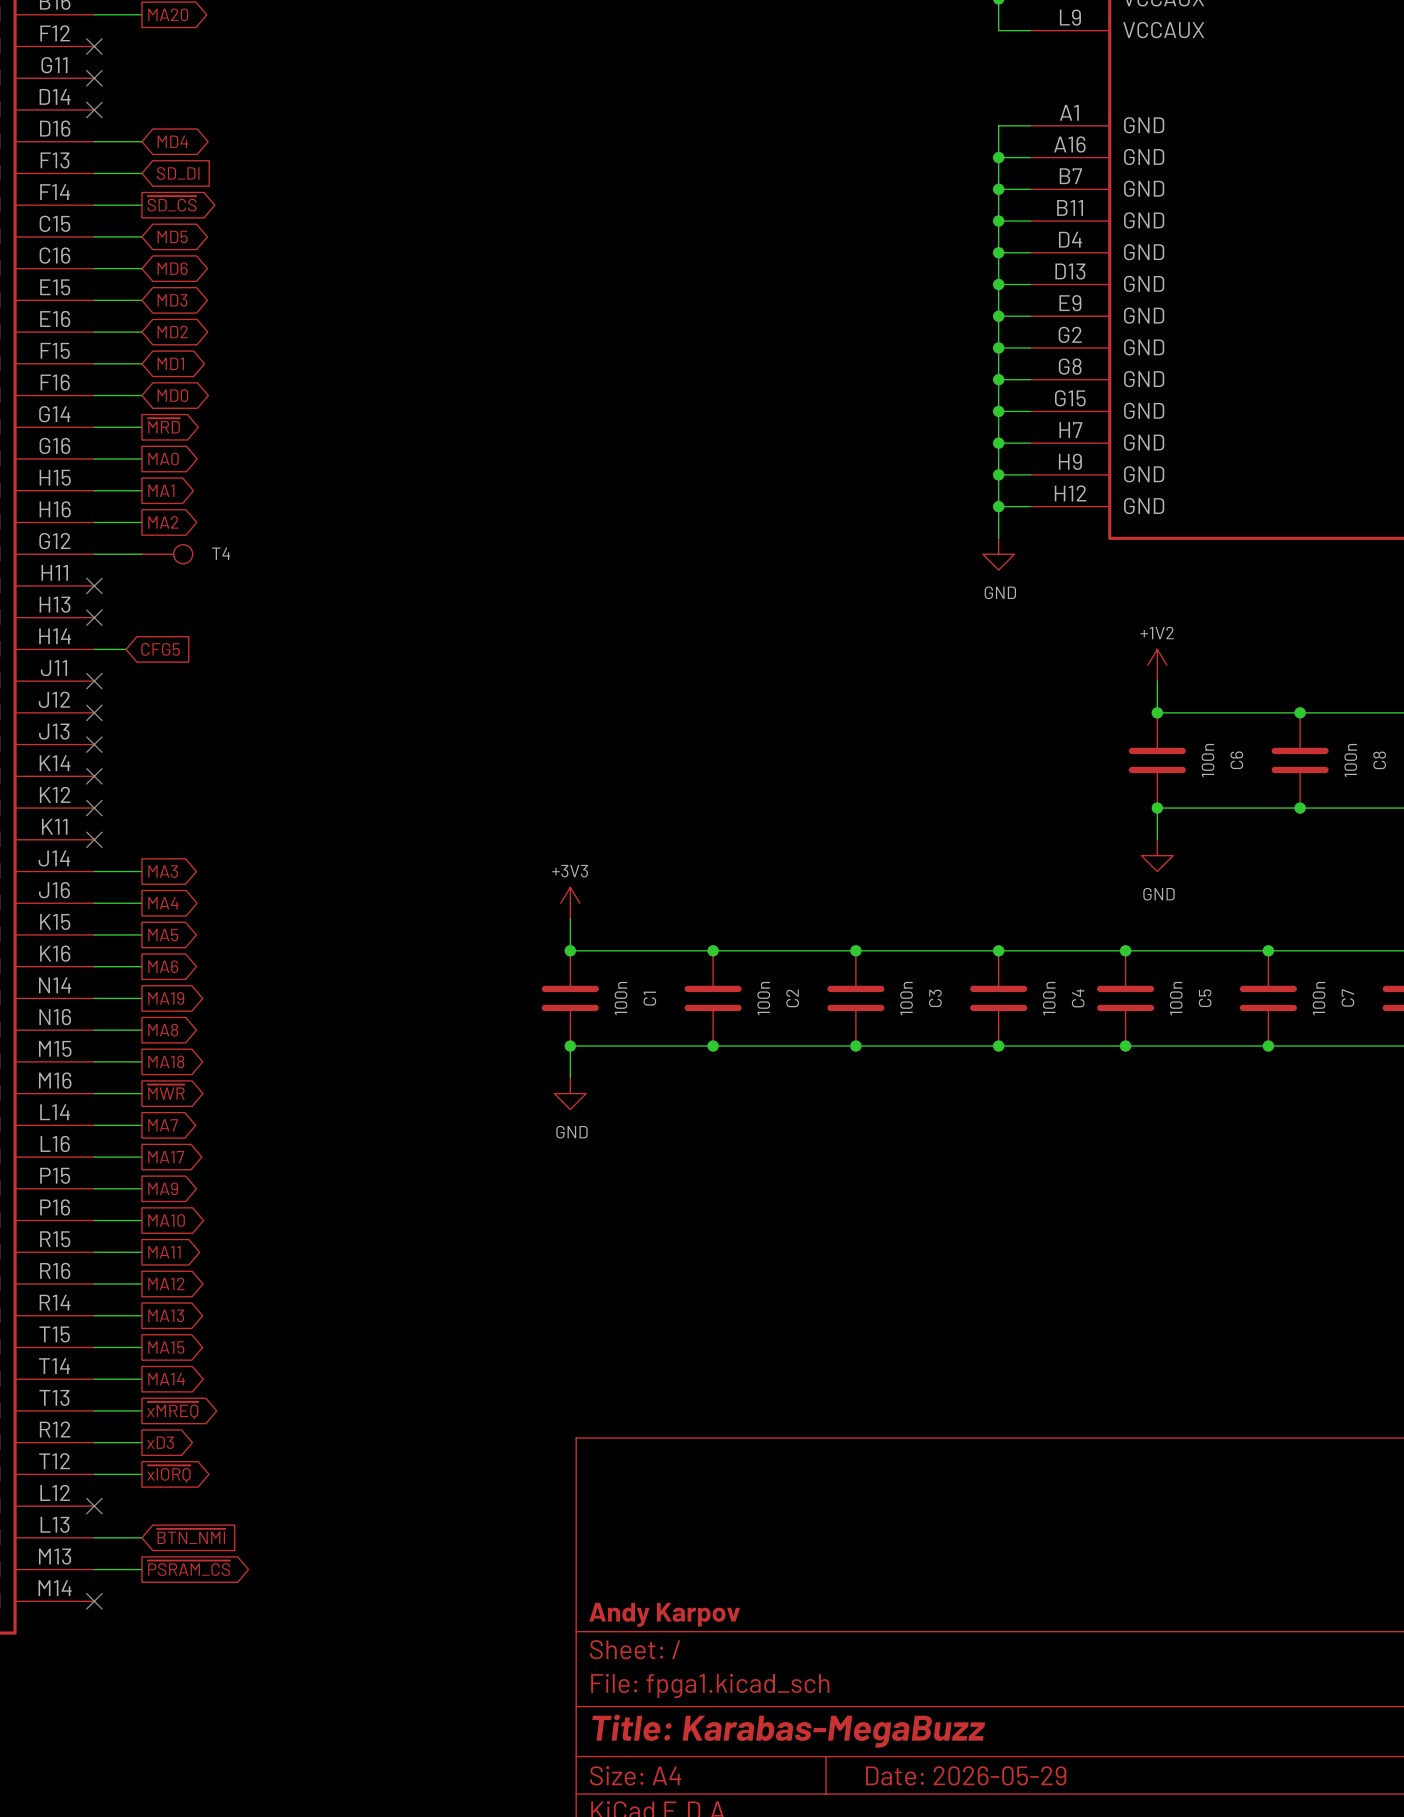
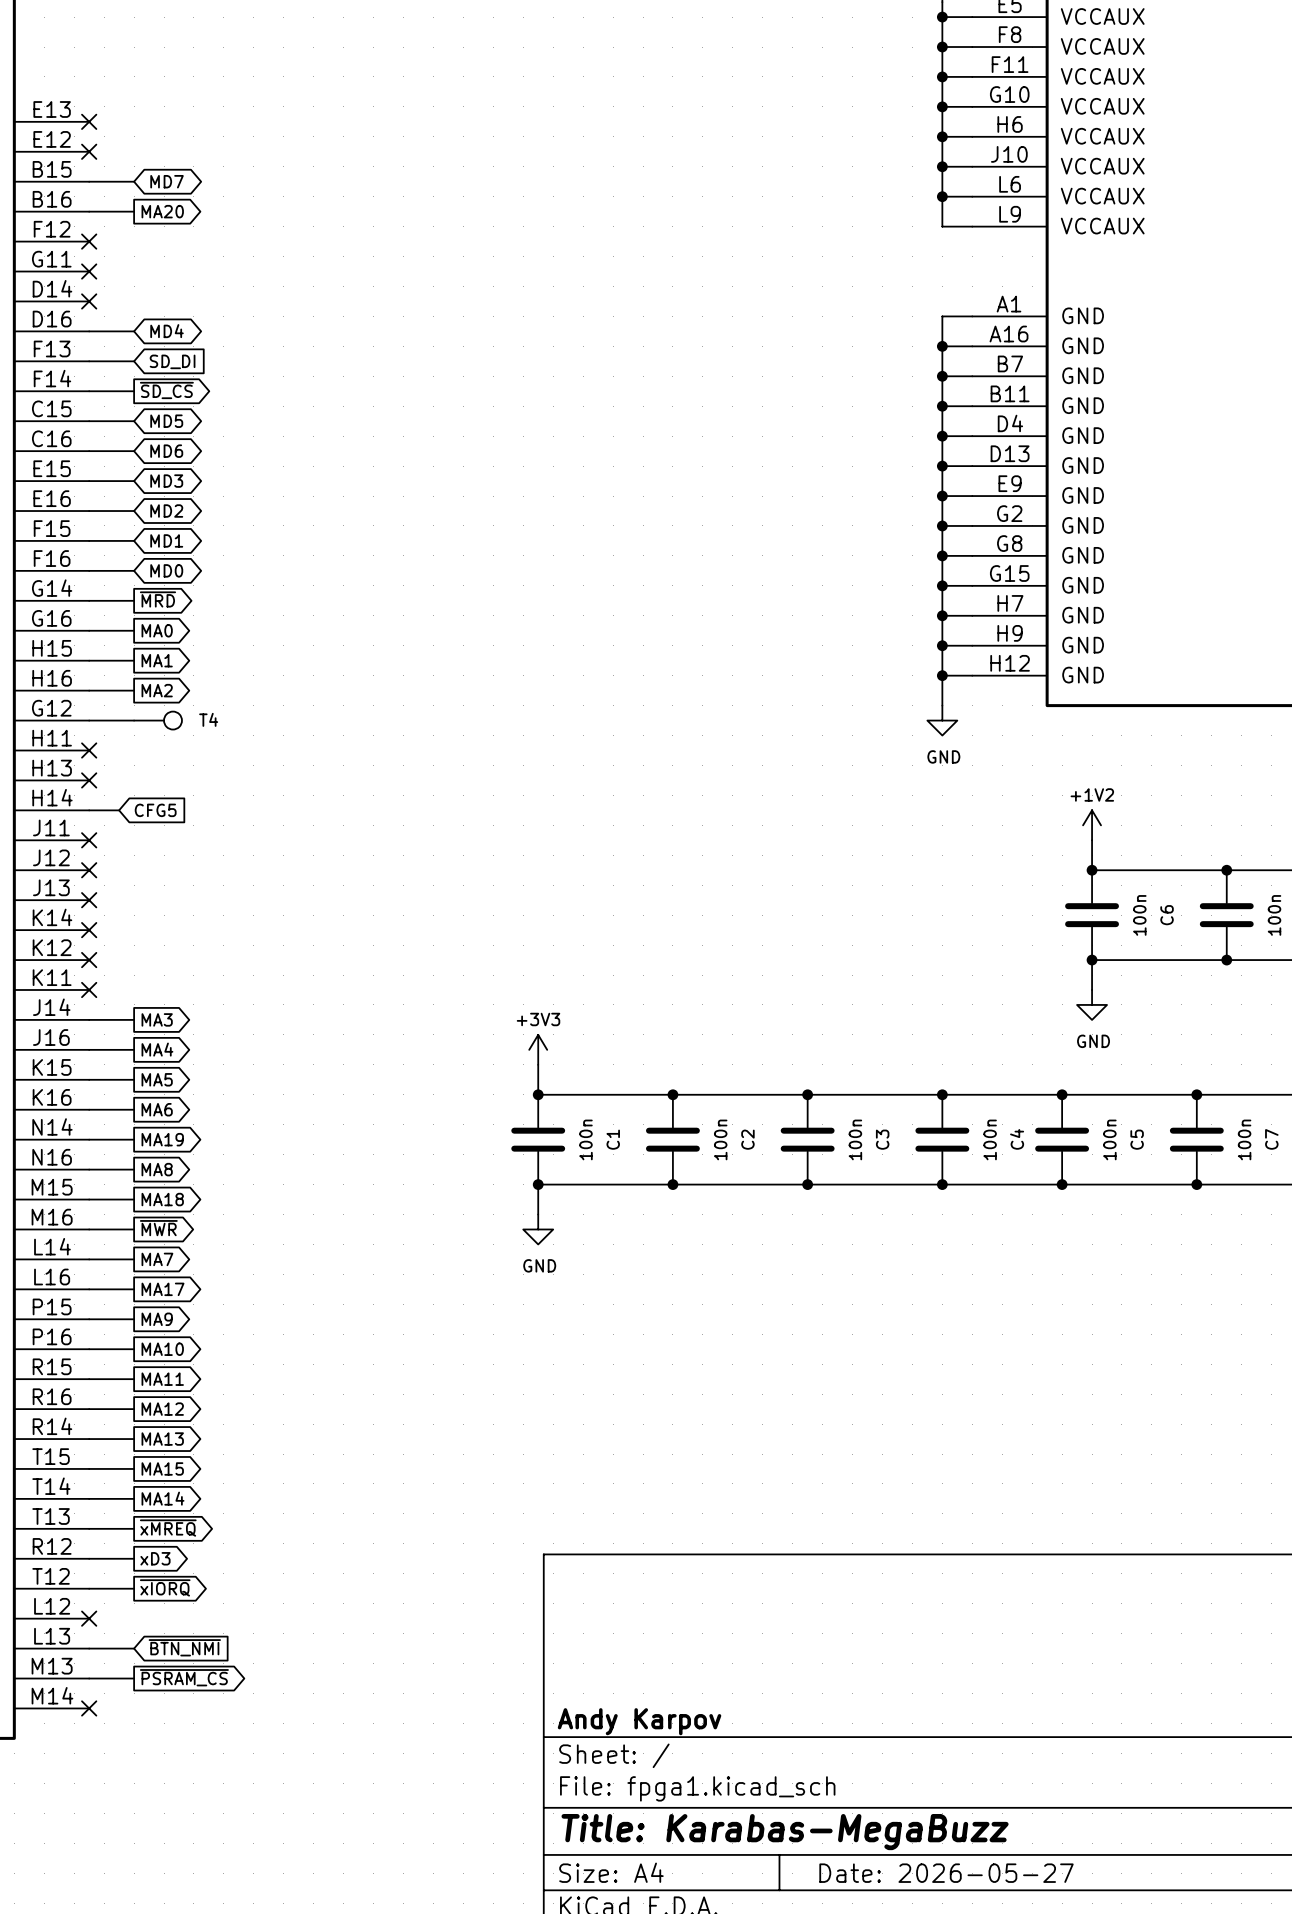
title block: Date: 2026-05-29 (966, 1775) -> Date: 2026-05-27 (946, 1873)

